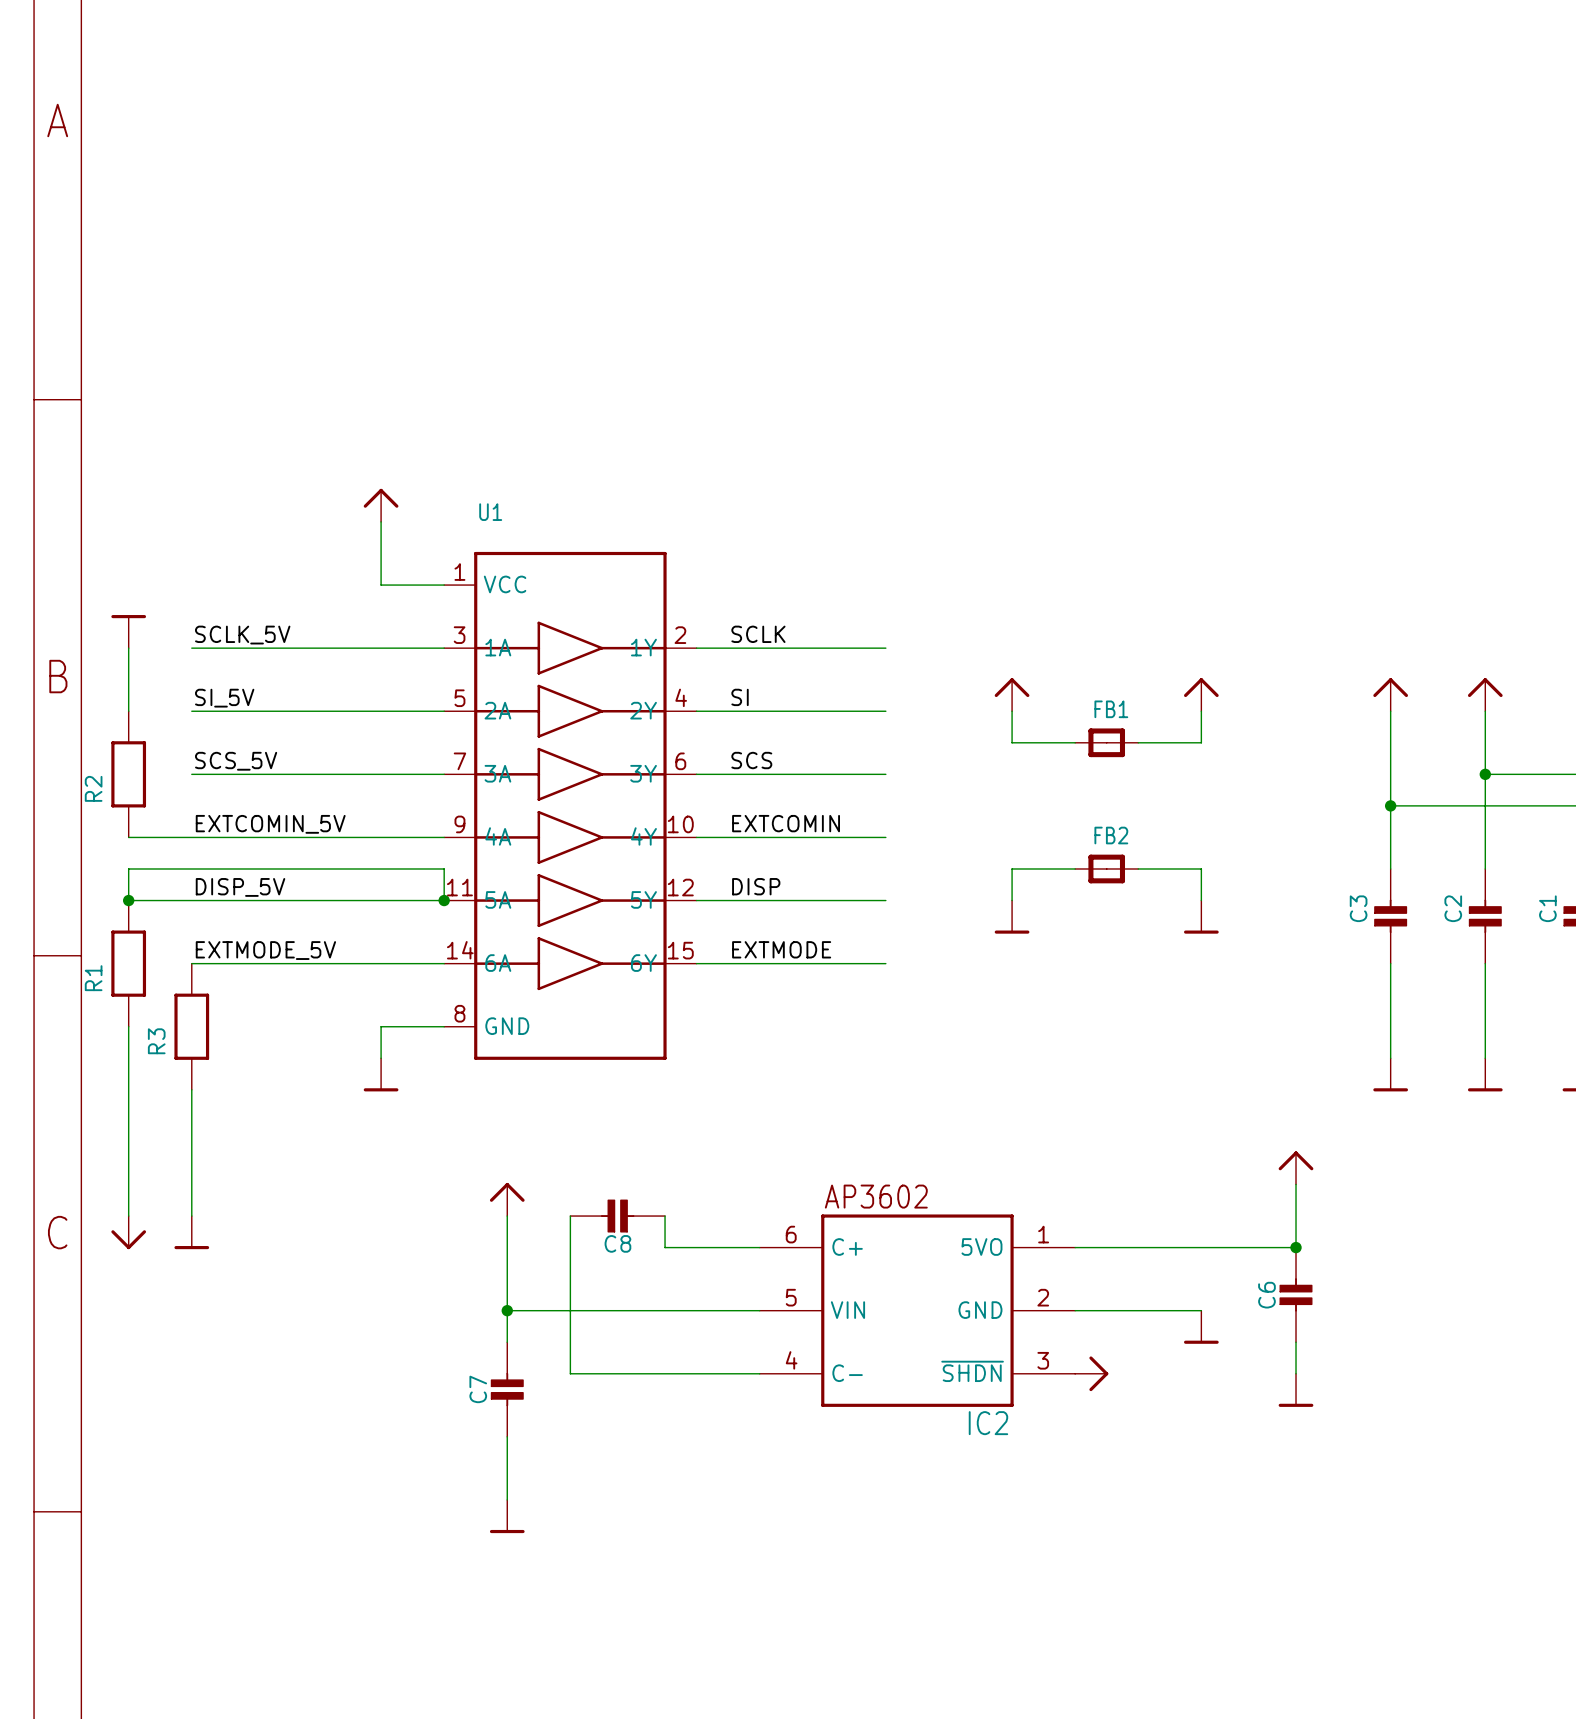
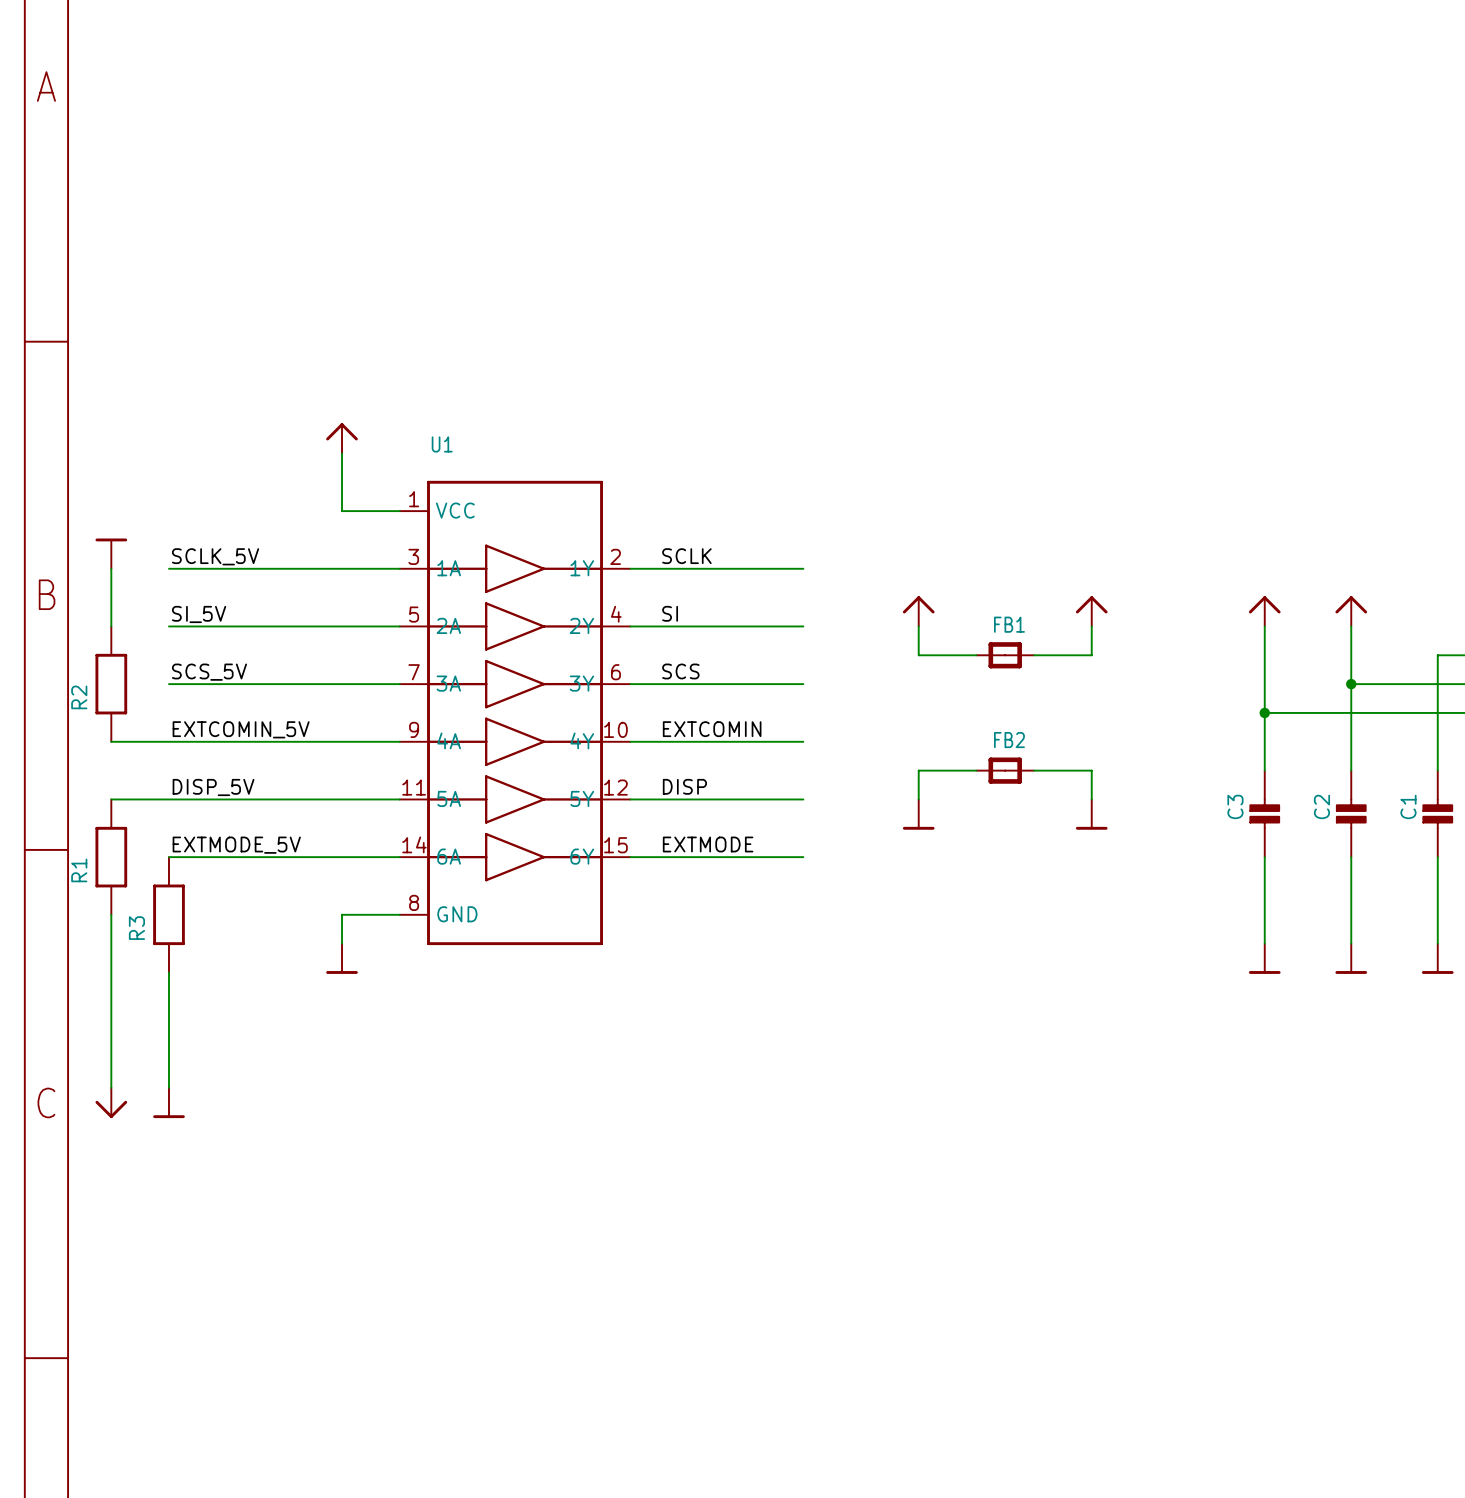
wire: (128, 900) (128, 868) (444, 868) (444, 900) -> none
junction: (128, 900) -> none
junction: (444, 900) -> none
power symbol: (1296, 1167) -> none
wire: (1296, 1184) (1296, 1247) (1075, 1247) -> none
power symbol: (507, 1199) -> none
wire: (507, 1216) (507, 1342) -> none
wire: (570, 1216) (570, 1373) (759, 1373) -> none
C8: (617, 1216) -> none
wire: (665, 1216) (665, 1247) (759, 1247) -> none
junction: (1296, 1247) -> none
C6: (1296, 1294) -> none
wire: (507, 1310) (759, 1310) -> none
junction: (507, 1310) -> none
IC2: (917, 1310) -> none
wire: (1075, 1310) (1201, 1310) -> none
power symbol: (1201, 1327) -> none
wire: (1296, 1342) (1296, 1373) -> none
power symbol: (1091, 1373) -> none
C7: (507, 1389) -> none
power symbol: (1296, 1390) -> none
wire: (507, 1436) (507, 1499) -> none
power symbol: (507, 1516) -> none

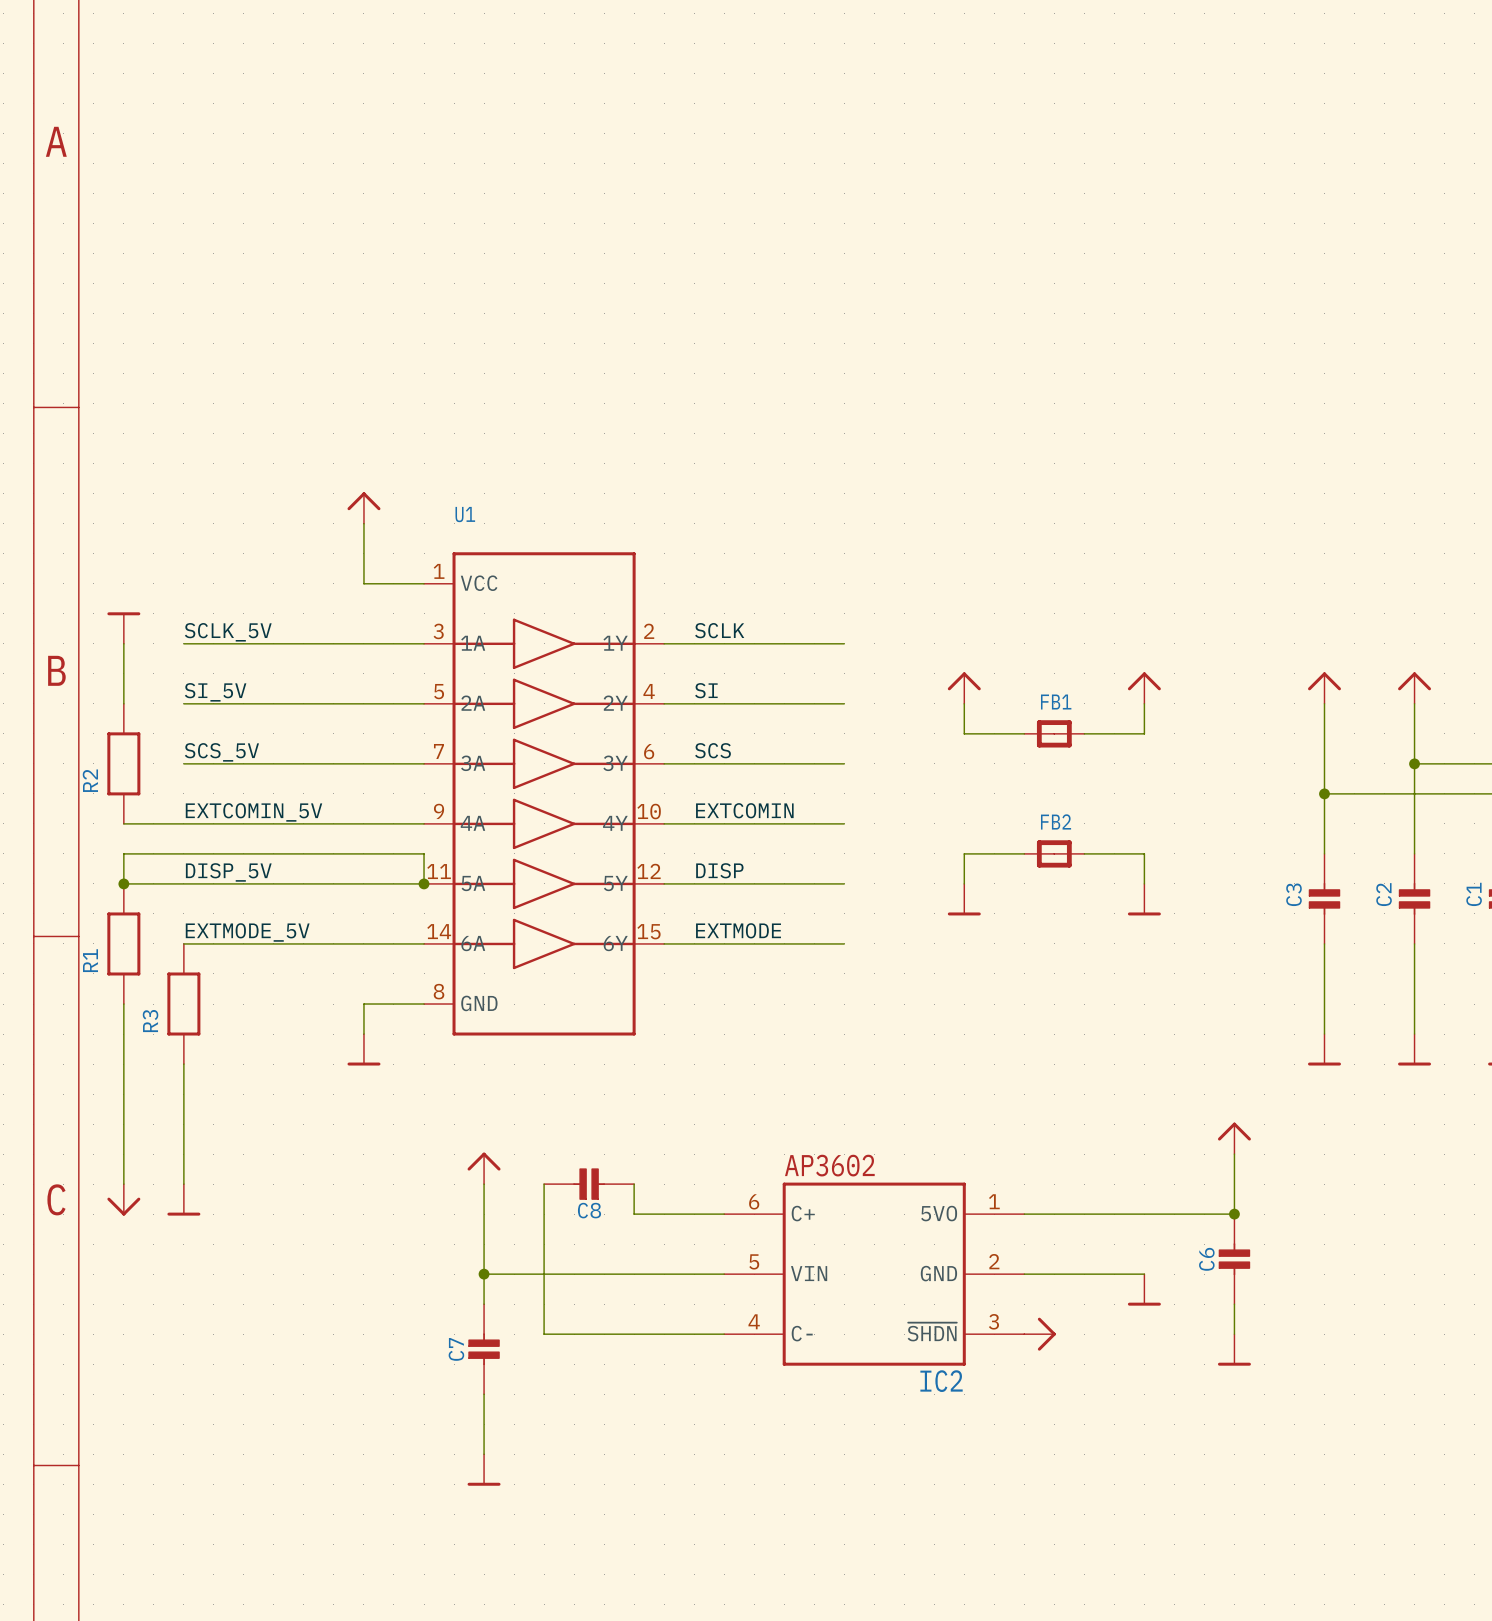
wire: none -> (123, 883) (123, 853) (424, 853) (424, 883)
junction: none -> (123, 883)
junction: none -> (424, 883)
power symbol: none -> (1234, 1138)
wire: none -> (1234, 1154) (1234, 1214) (1024, 1214)
power symbol: none -> (484, 1168)
wire: none -> (484, 1184) (484, 1304)
wire: none -> (544, 1184) (544, 1334) (724, 1334)
C8: none -> (589, 1184)
wire: none -> (634, 1184) (634, 1214) (724, 1214)
junction: none -> (1234, 1214)
C6: none -> (1234, 1259)
wire: none -> (484, 1274) (724, 1274)
junction: none -> (484, 1274)
IC2: none -> (874, 1274)
wire: none -> (1024, 1274) (1144, 1274)
power symbol: none -> (1144, 1289)
wire: none -> (1234, 1304) (1234, 1334)
power symbol: none -> (1040, 1334)
C7: none -> (484, 1349)
power symbol: none -> (1234, 1349)
wire: none -> (484, 1394) (484, 1454)
power symbol: none -> (484, 1470)

